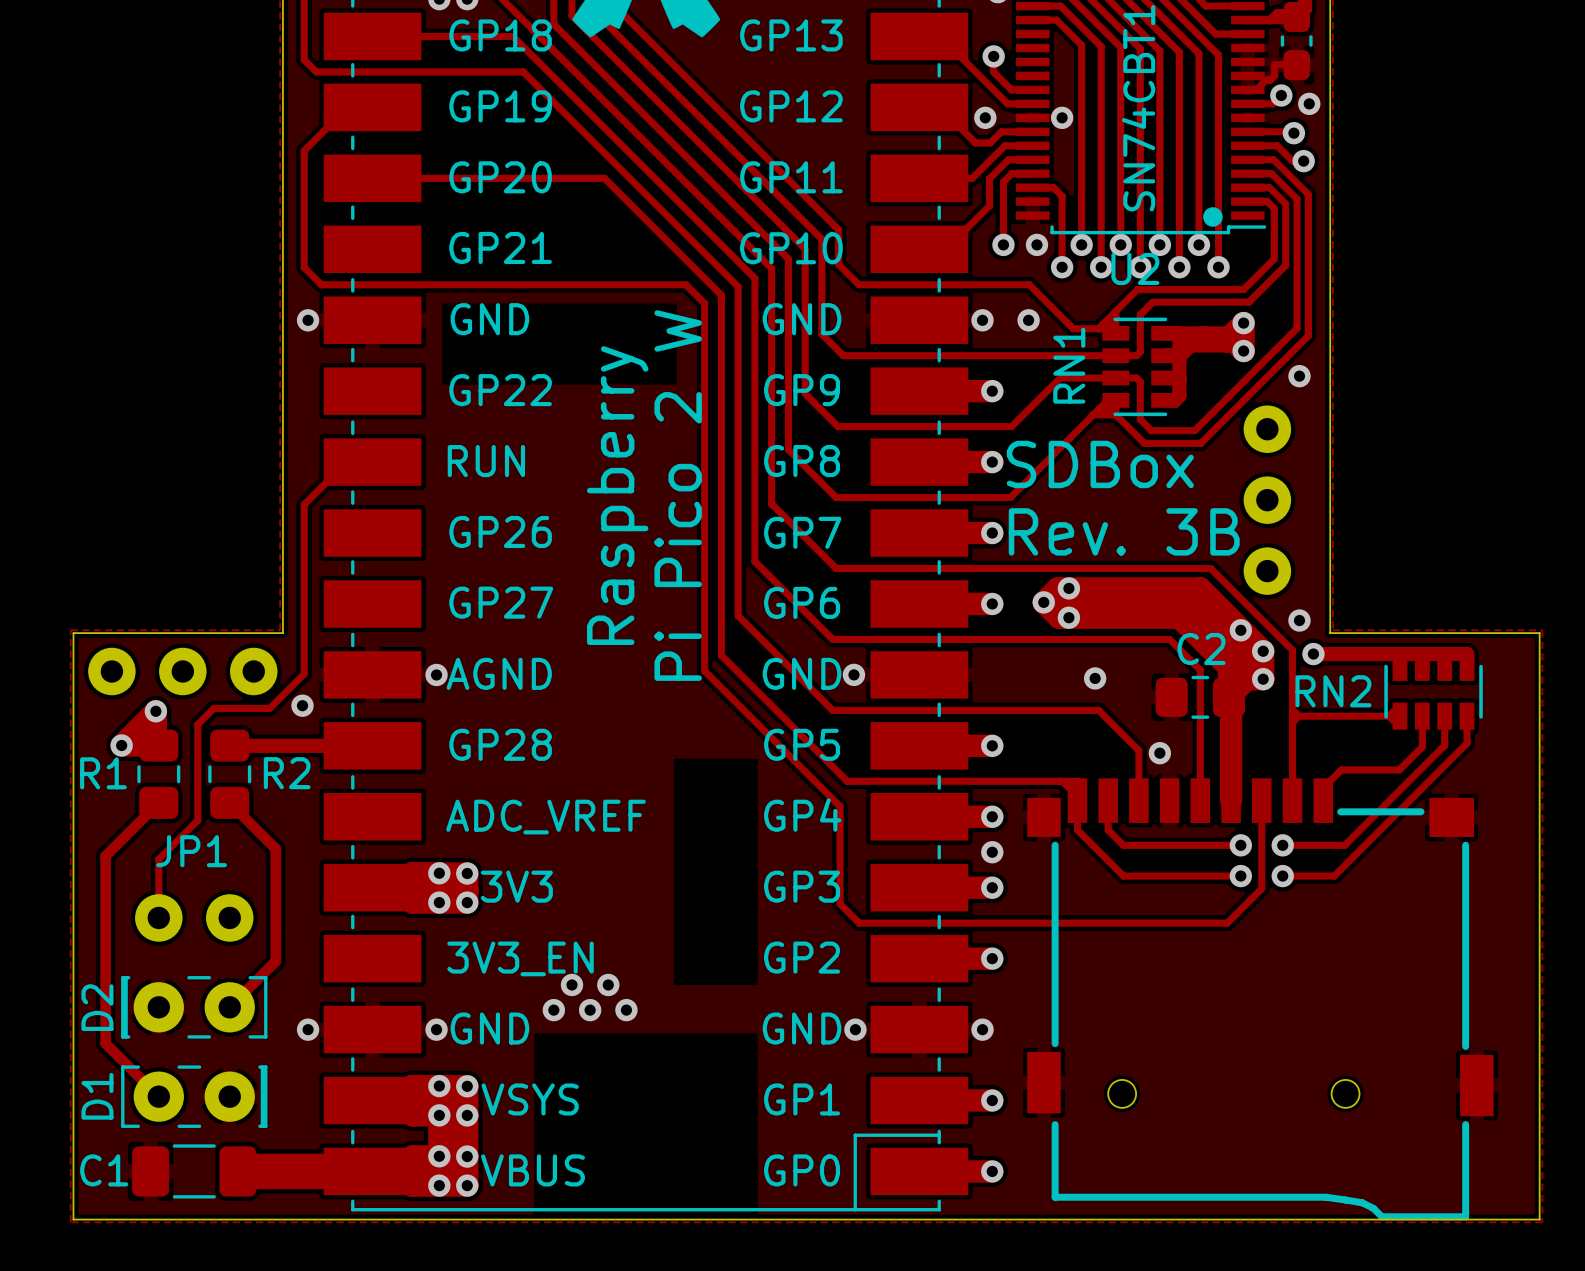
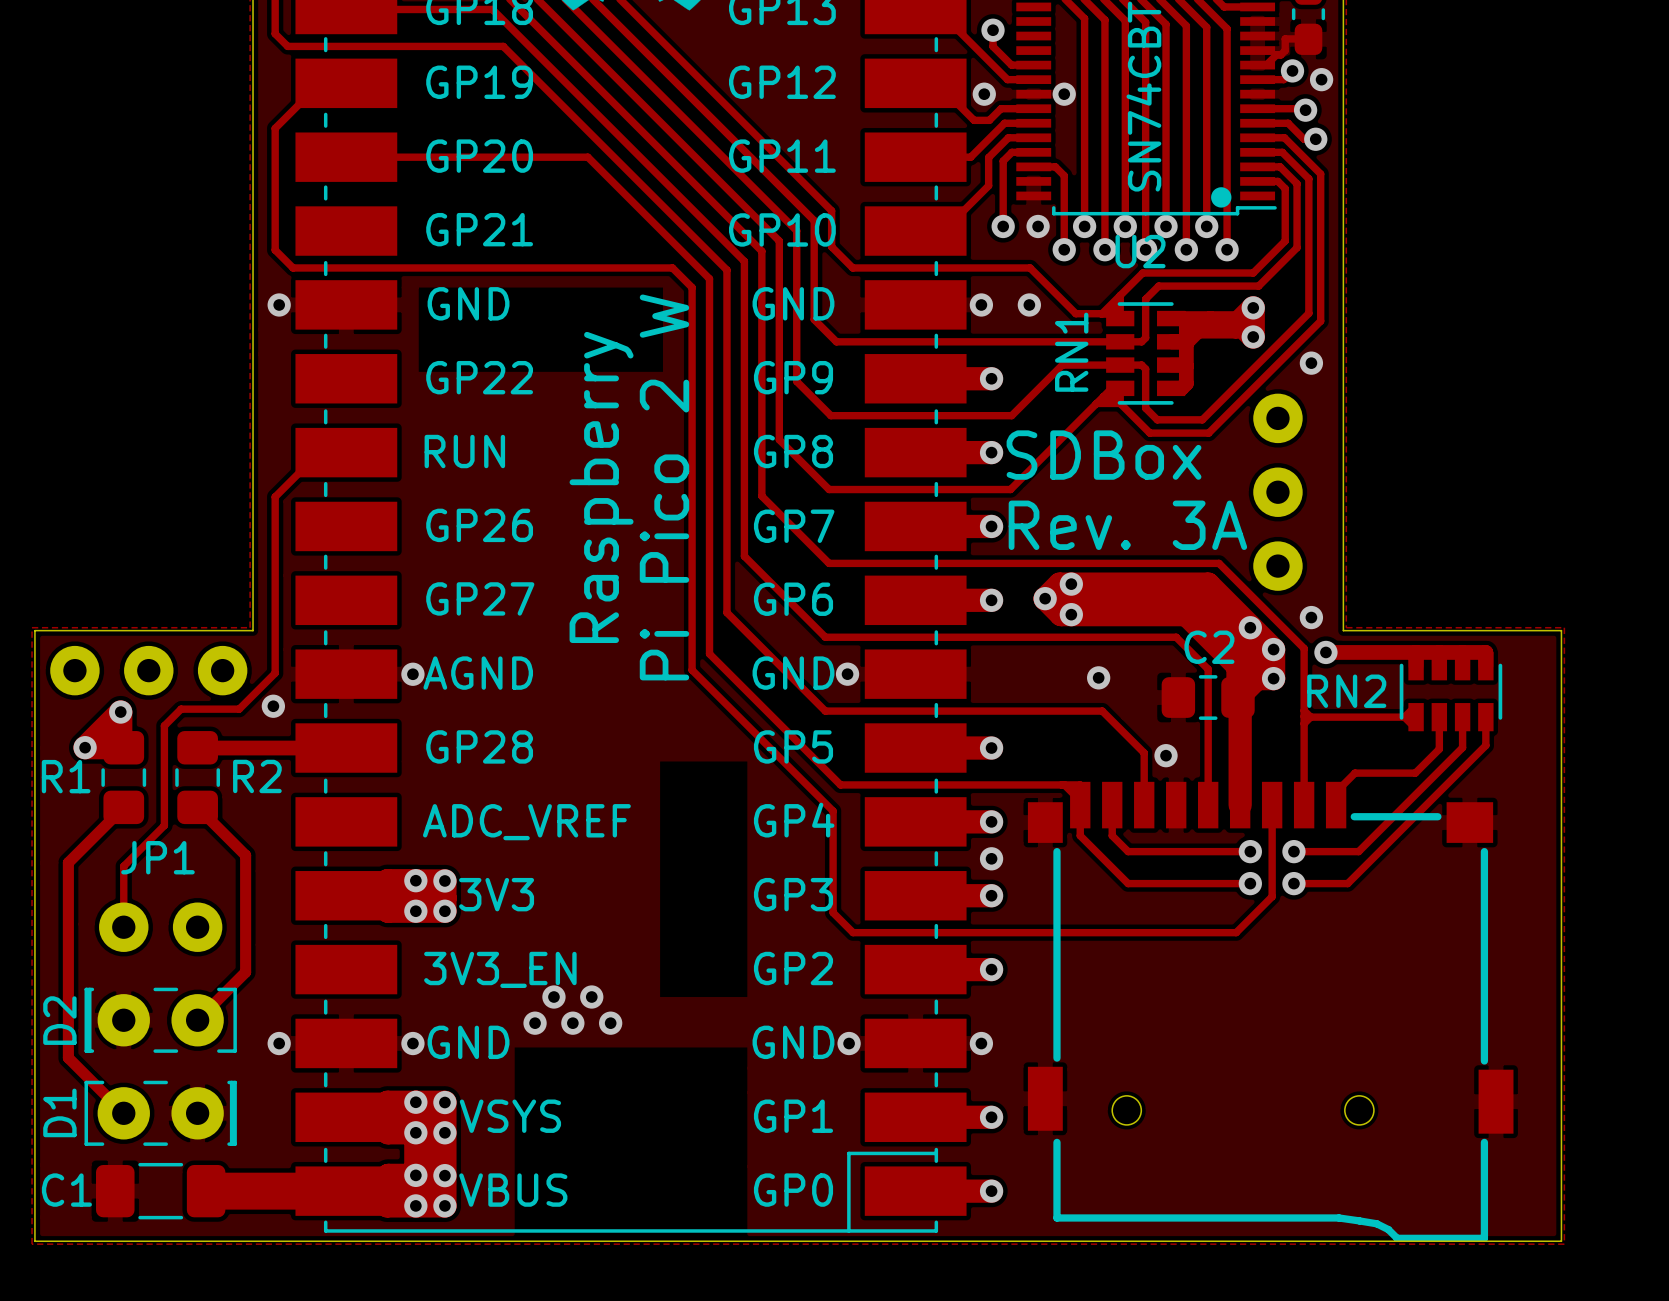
text: Rev. 3B (1124, 531) -> Rev. 3A (1127, 525)

